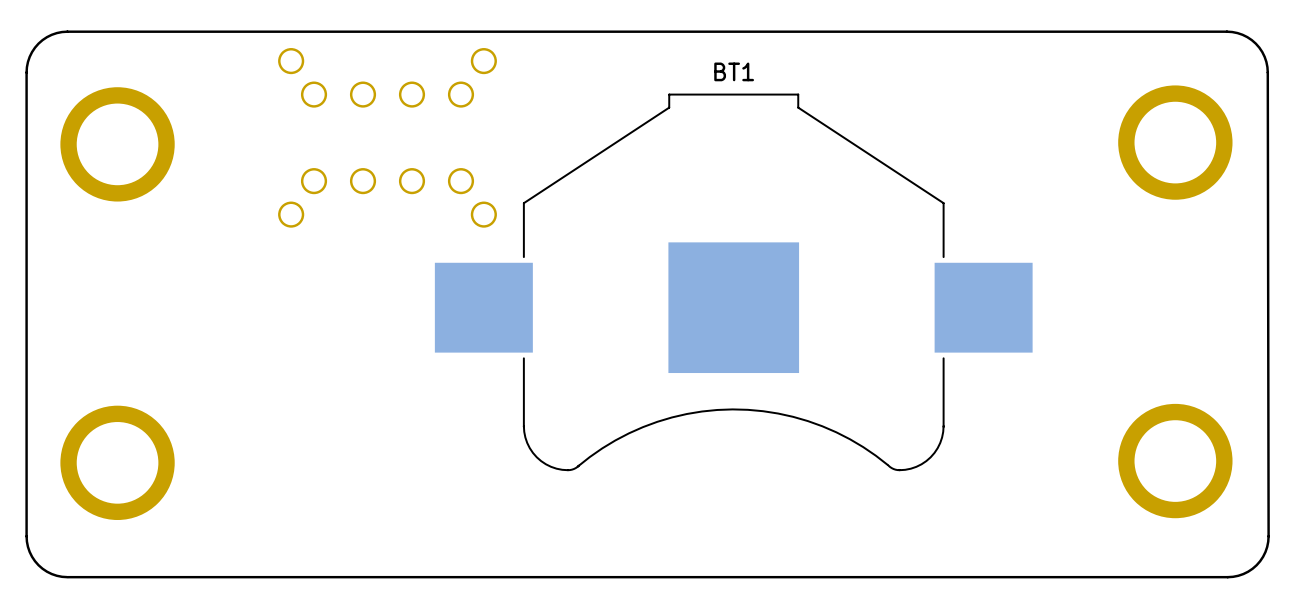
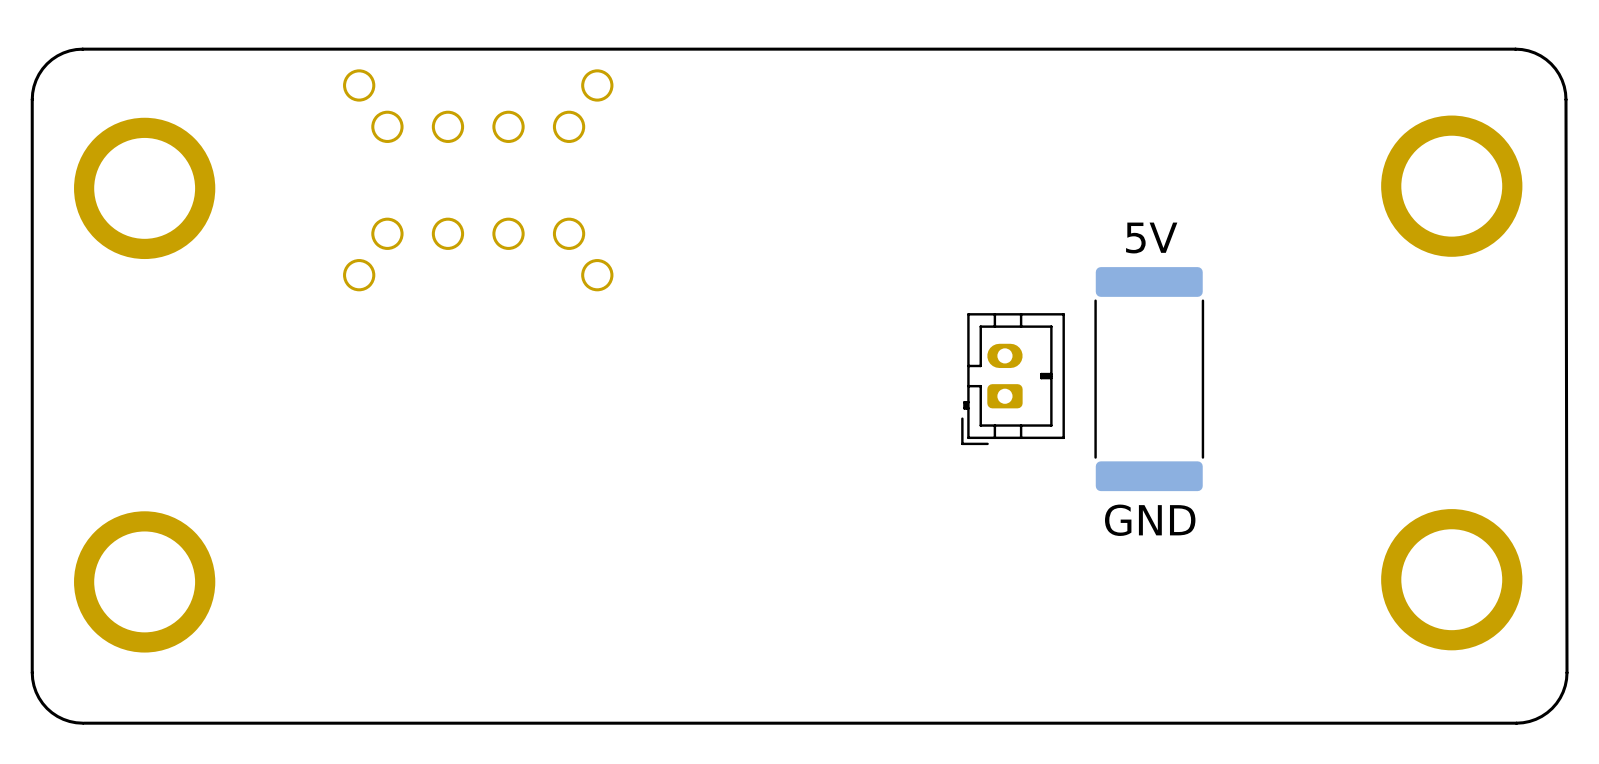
text: none -> 5V (1151, 238)
BT1: (733, 282) -> none
part: none -> (1013, 379)
part: none -> (1149, 379)
text: none -> GND (1150, 520)

